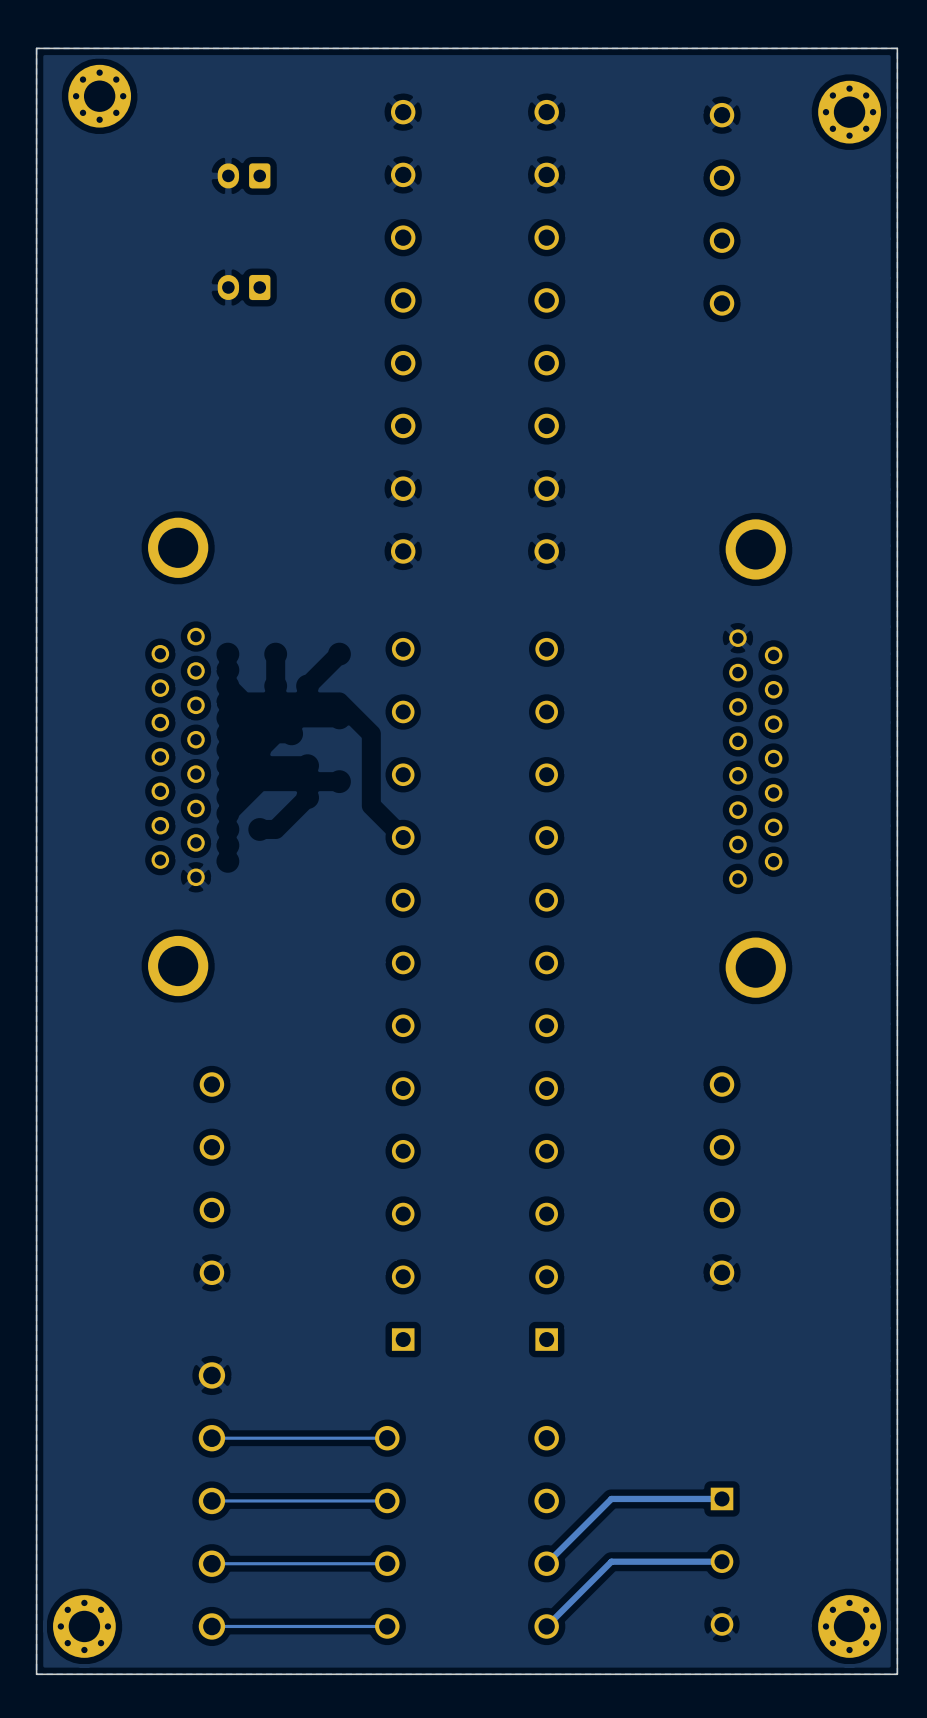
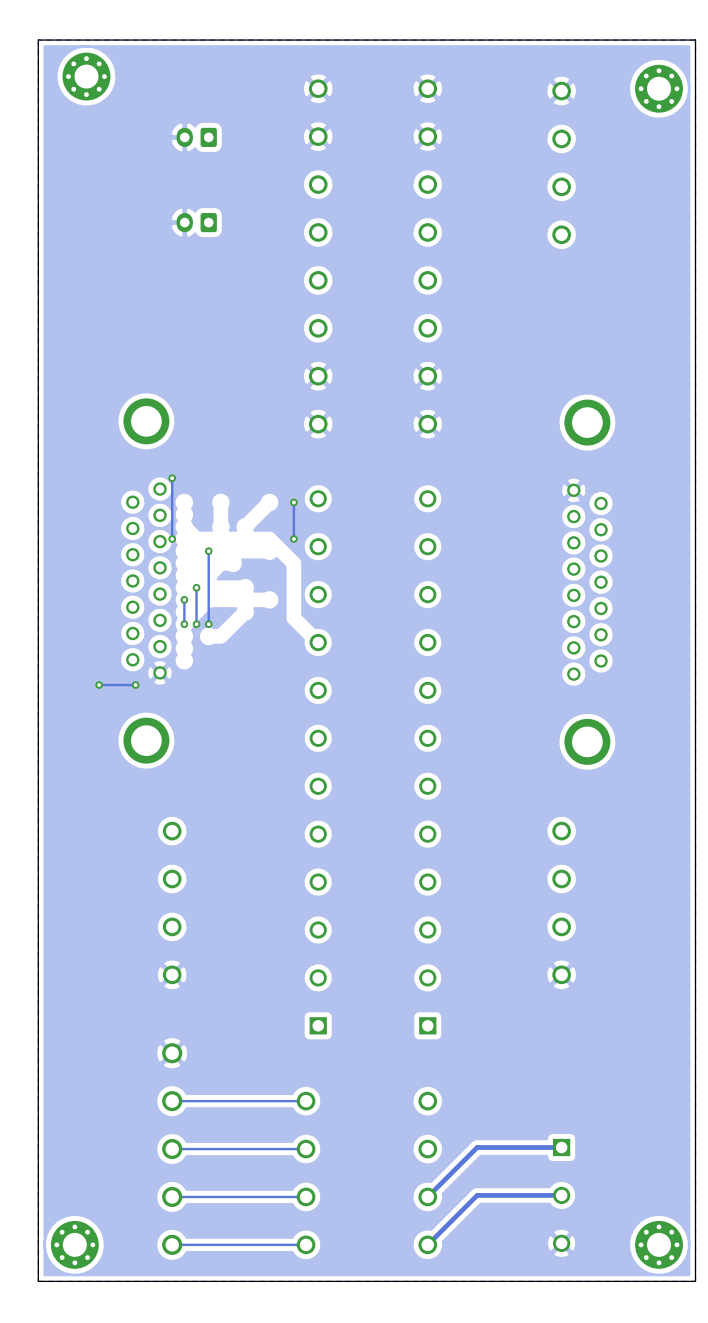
track: none -> (172, 478) (172, 539)
via: none -> (172, 478)
track: none -> (293, 502) (293, 539)
via: none -> (293, 502)
via: none -> (172, 539)
via: none -> (293, 539)
track: none -> (208, 551) (208, 624)
via: none -> (208, 551)
track: none -> (196, 587) (196, 624)
via: none -> (196, 587)
track: none -> (184, 599) (184, 624)
via: none -> (184, 599)
via: none -> (184, 624)
via: none -> (196, 624)
via: none -> (208, 624)
via: none -> (99, 685)
track: none -> (135, 685) (99, 685)
via: none -> (135, 685)

